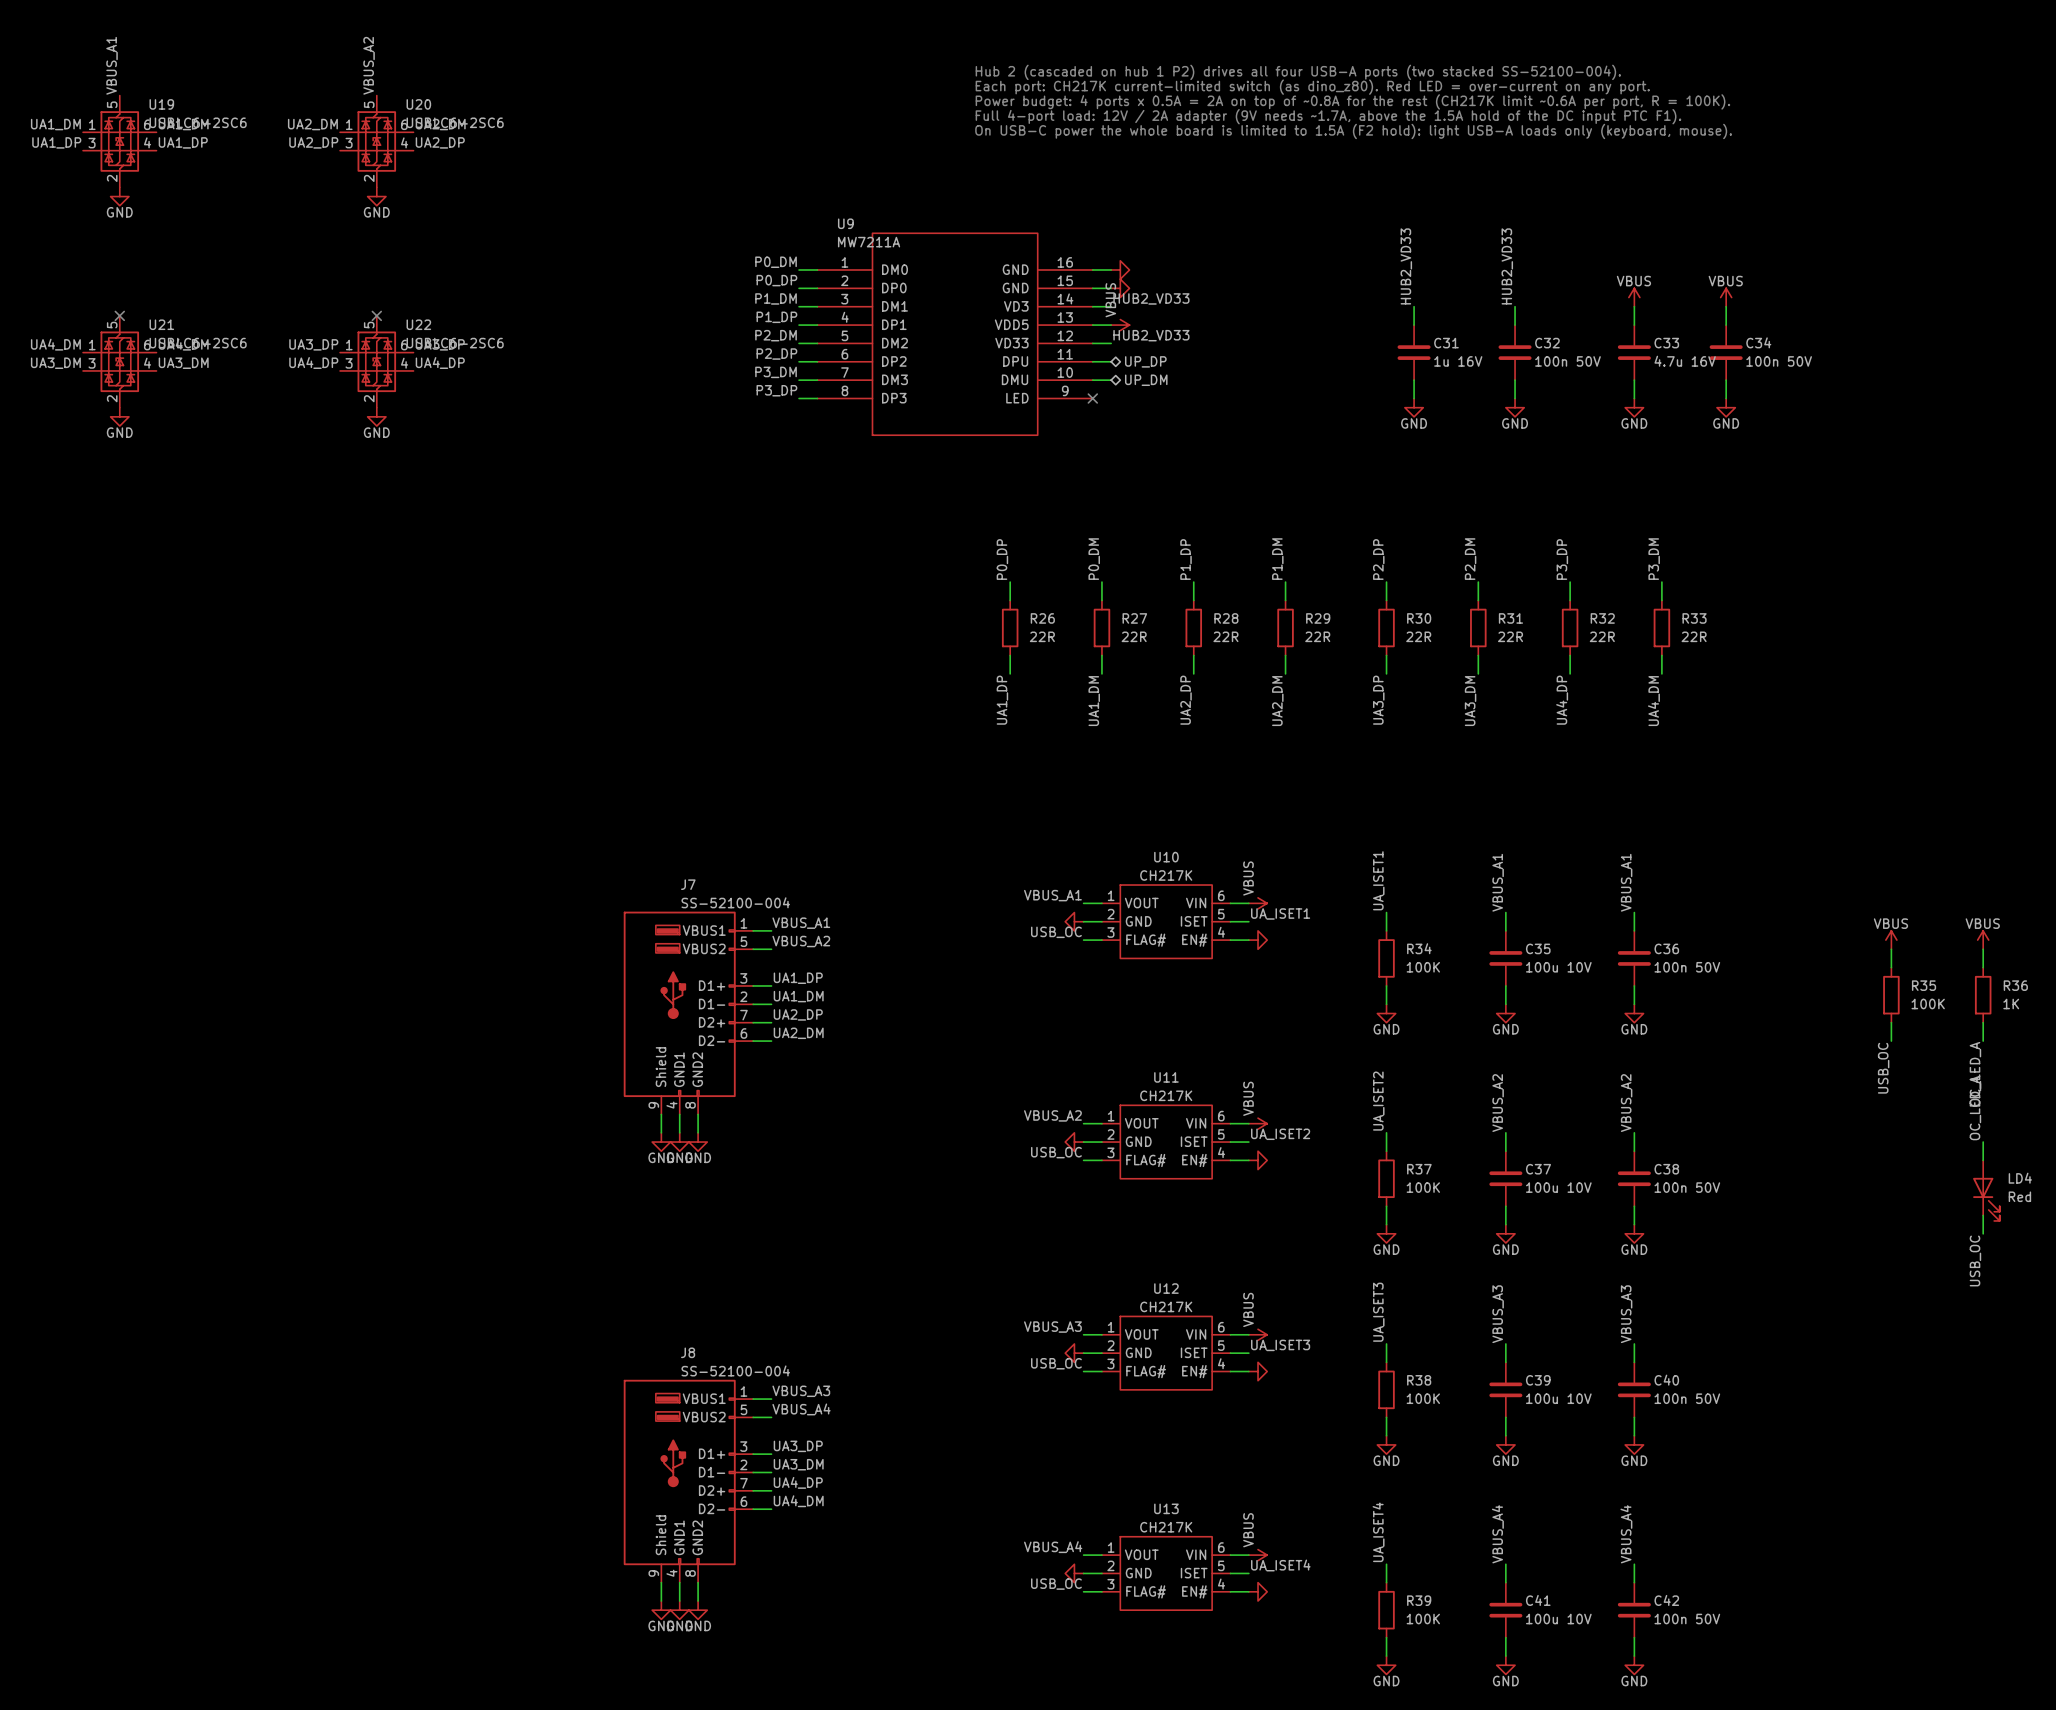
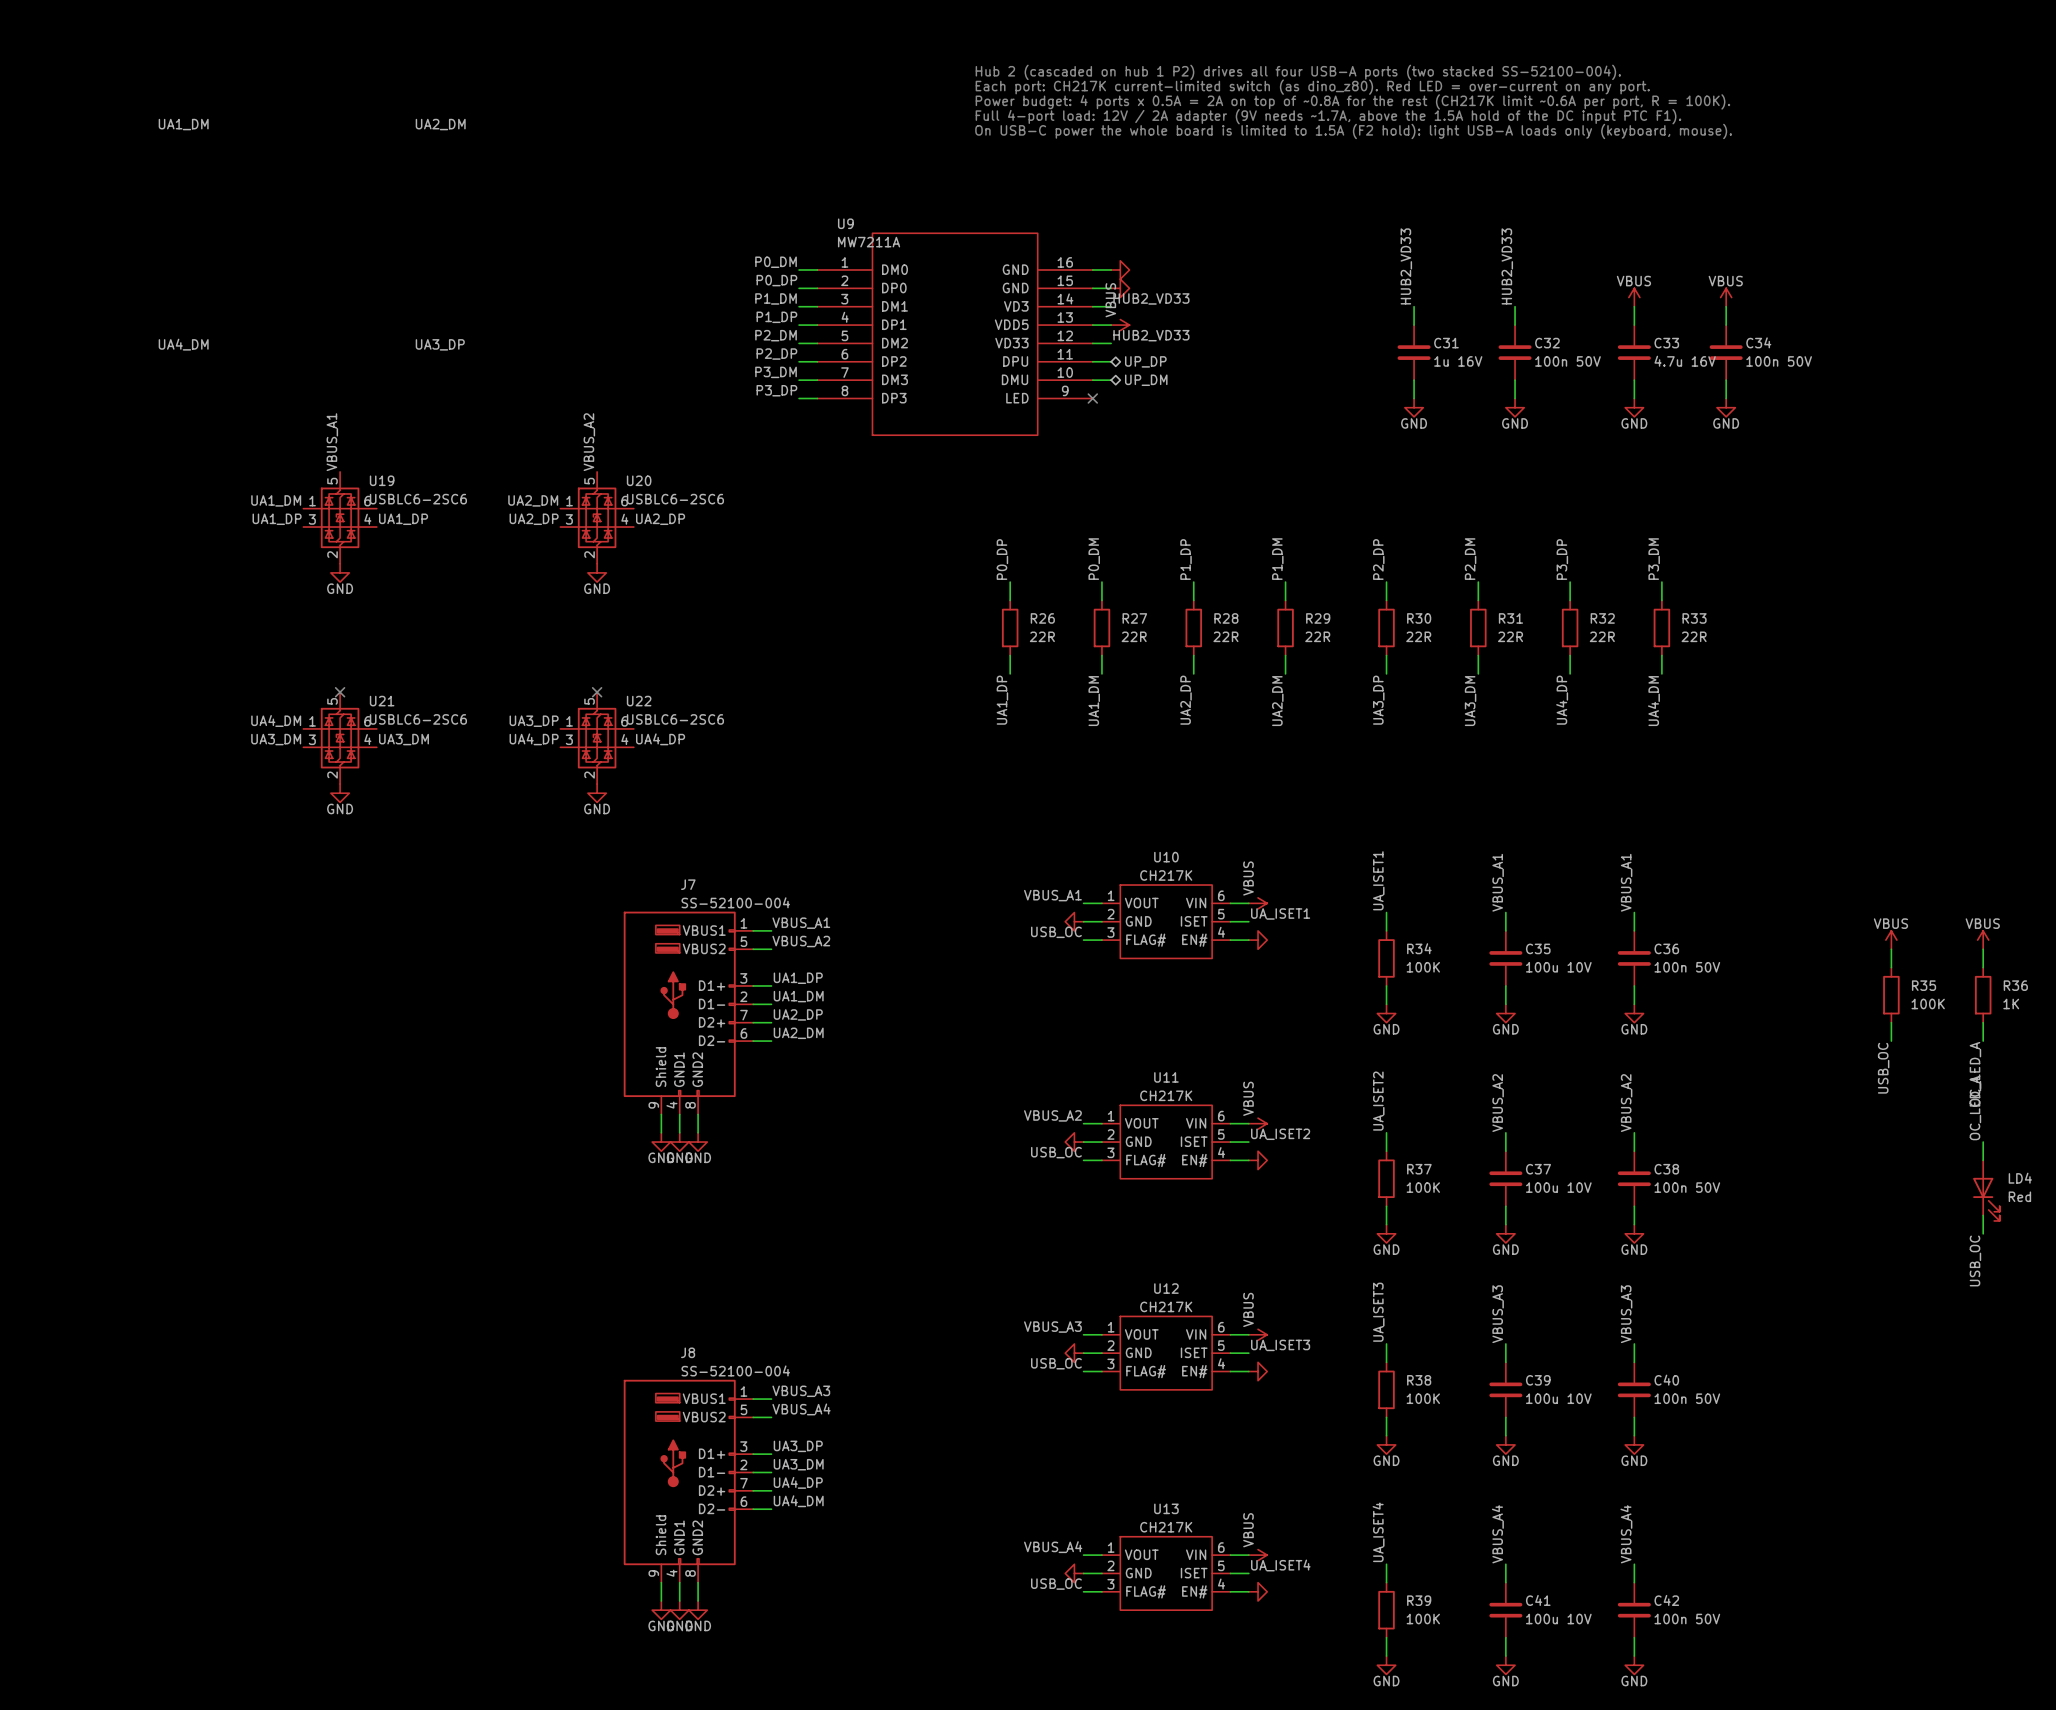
label: VBUS_A1 (112, 65) -> none
label: VBUS_A2 (369, 65) -> none
label: UA1_DM (55, 124) -> none
label: UA2_DM (312, 124) -> none
U19 position: (119, 141) -> (340, 517)
U20 position: (376, 141) -> (597, 517)
label: UA1_DP (56, 142) -> none
label: UA1_DP (183, 142) -> none
label: UA2_DP (313, 142) -> none
label: UA2_DP (440, 142) -> none
power symbol: GND (119, 196) -> none
power symbol: GND (376, 196) -> none
no-connect mark: (119, 315) -> none
no-connect mark: (376, 315) -> none
label: UA4_DM (55, 344) -> none
label: UA3_DP (313, 344) -> none
U21 position: (119, 361) -> (340, 738)
U22 position: (376, 361) -> (597, 738)
label: UA4_DP (313, 362) -> none
label: UA4_DP (440, 362) -> none
label: UA3_DM (55, 363) -> none
label: UA3_DM (183, 363) -> none
power symbol: GND (119, 416) -> none
power symbol: GND (376, 416) -> none
label: none -> VBUS_A1 (332, 442)
label: none -> VBUS_A2 (589, 442)
label: none -> UA1_DM (276, 500)
label: none -> UA2_DM (533, 500)
label: none -> UA1_DP (277, 519)
label: none -> UA1_DP (403, 519)
label: none -> UA2_DP (534, 519)
label: none -> UA2_DP (660, 519)
power symbol: none -> GND (340, 572)
power symbol: none -> GND (597, 572)
no-connect mark: none -> (340, 692)
no-connect mark: none -> (597, 692)
label: none -> UA4_DM (276, 720)
label: none -> UA3_DP (534, 721)
label: none -> UA3_DM (276, 739)
label: none -> UA3_DM (403, 739)
label: none -> UA4_DP (534, 739)
label: none -> UA4_DP (660, 739)
power symbol: none -> GND (340, 793)
power symbol: none -> GND (597, 793)

